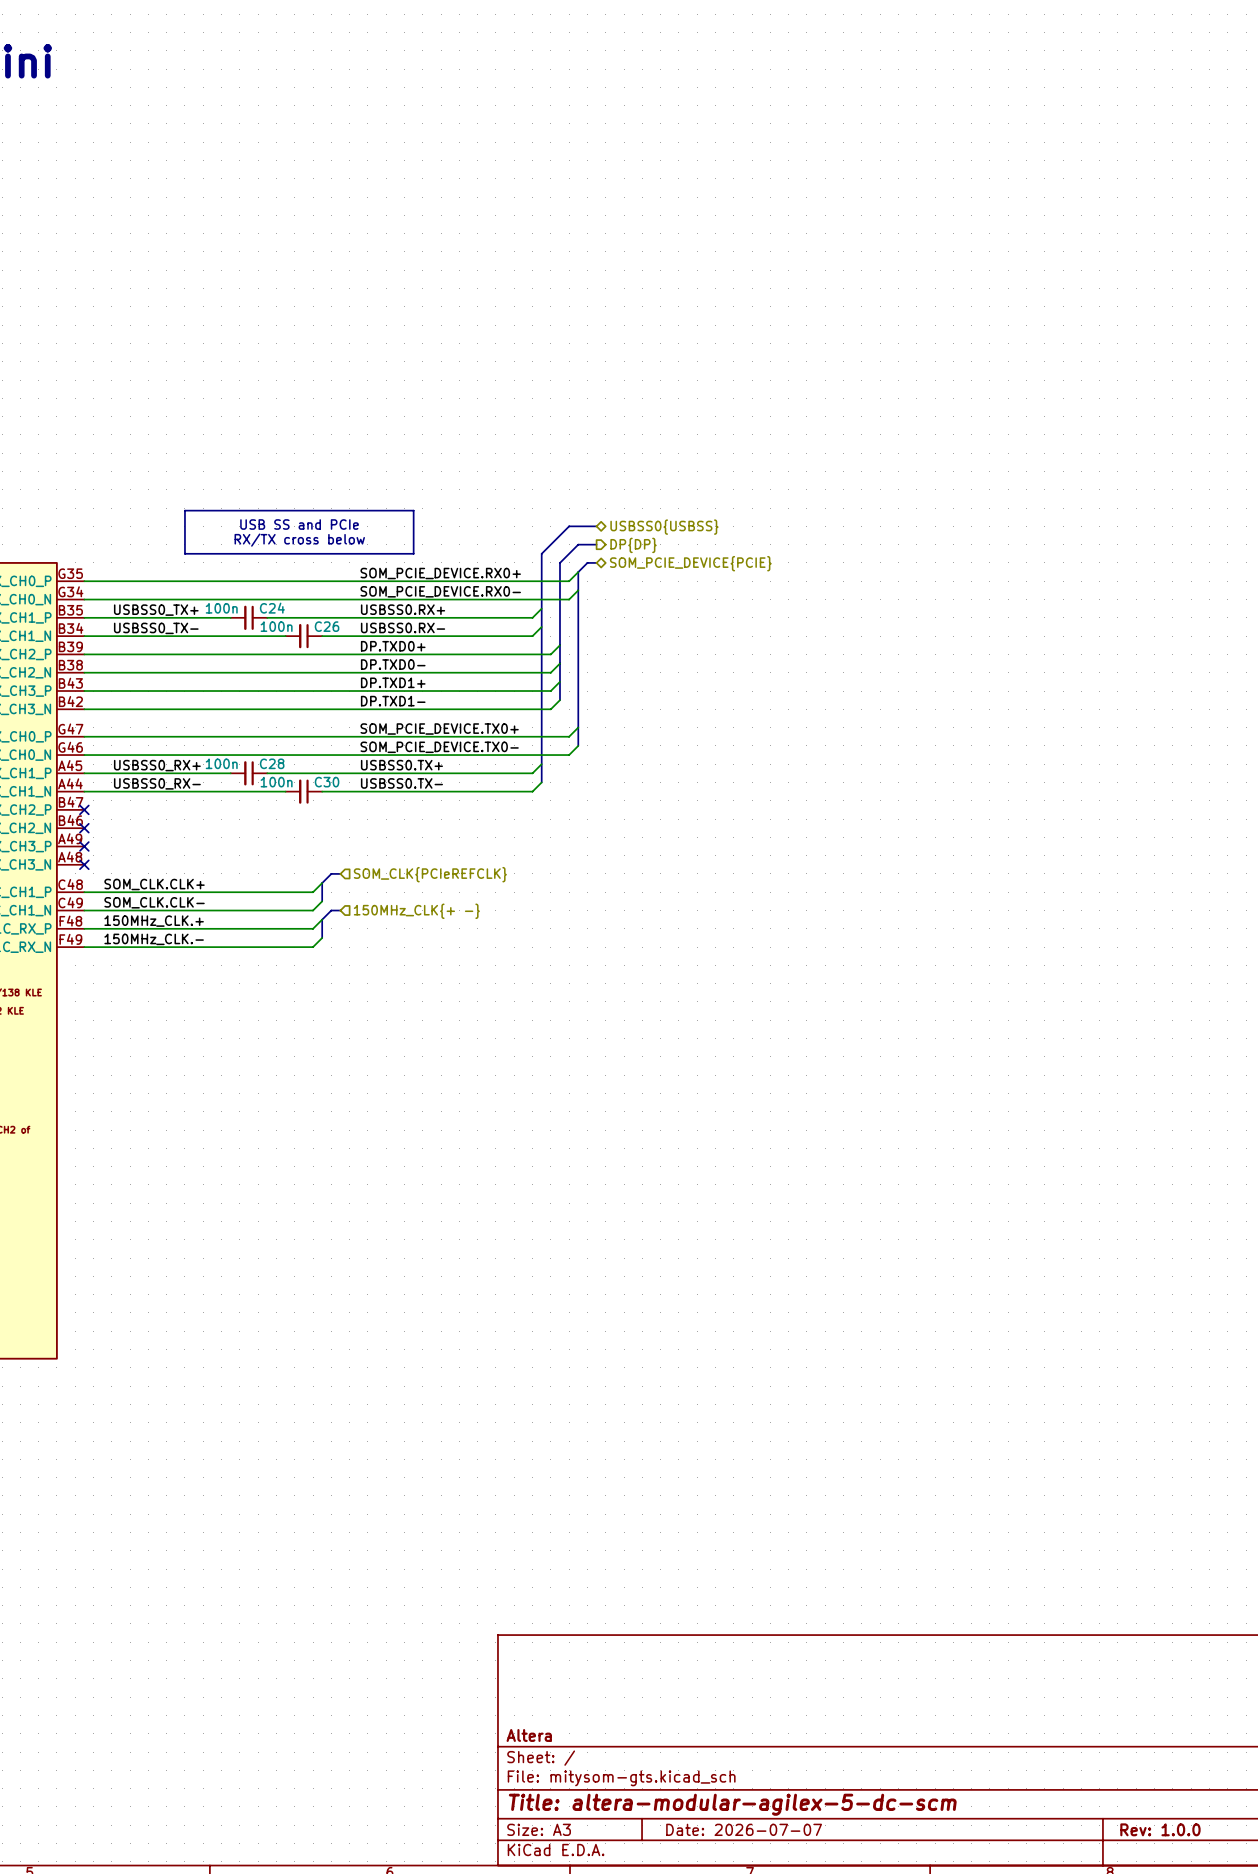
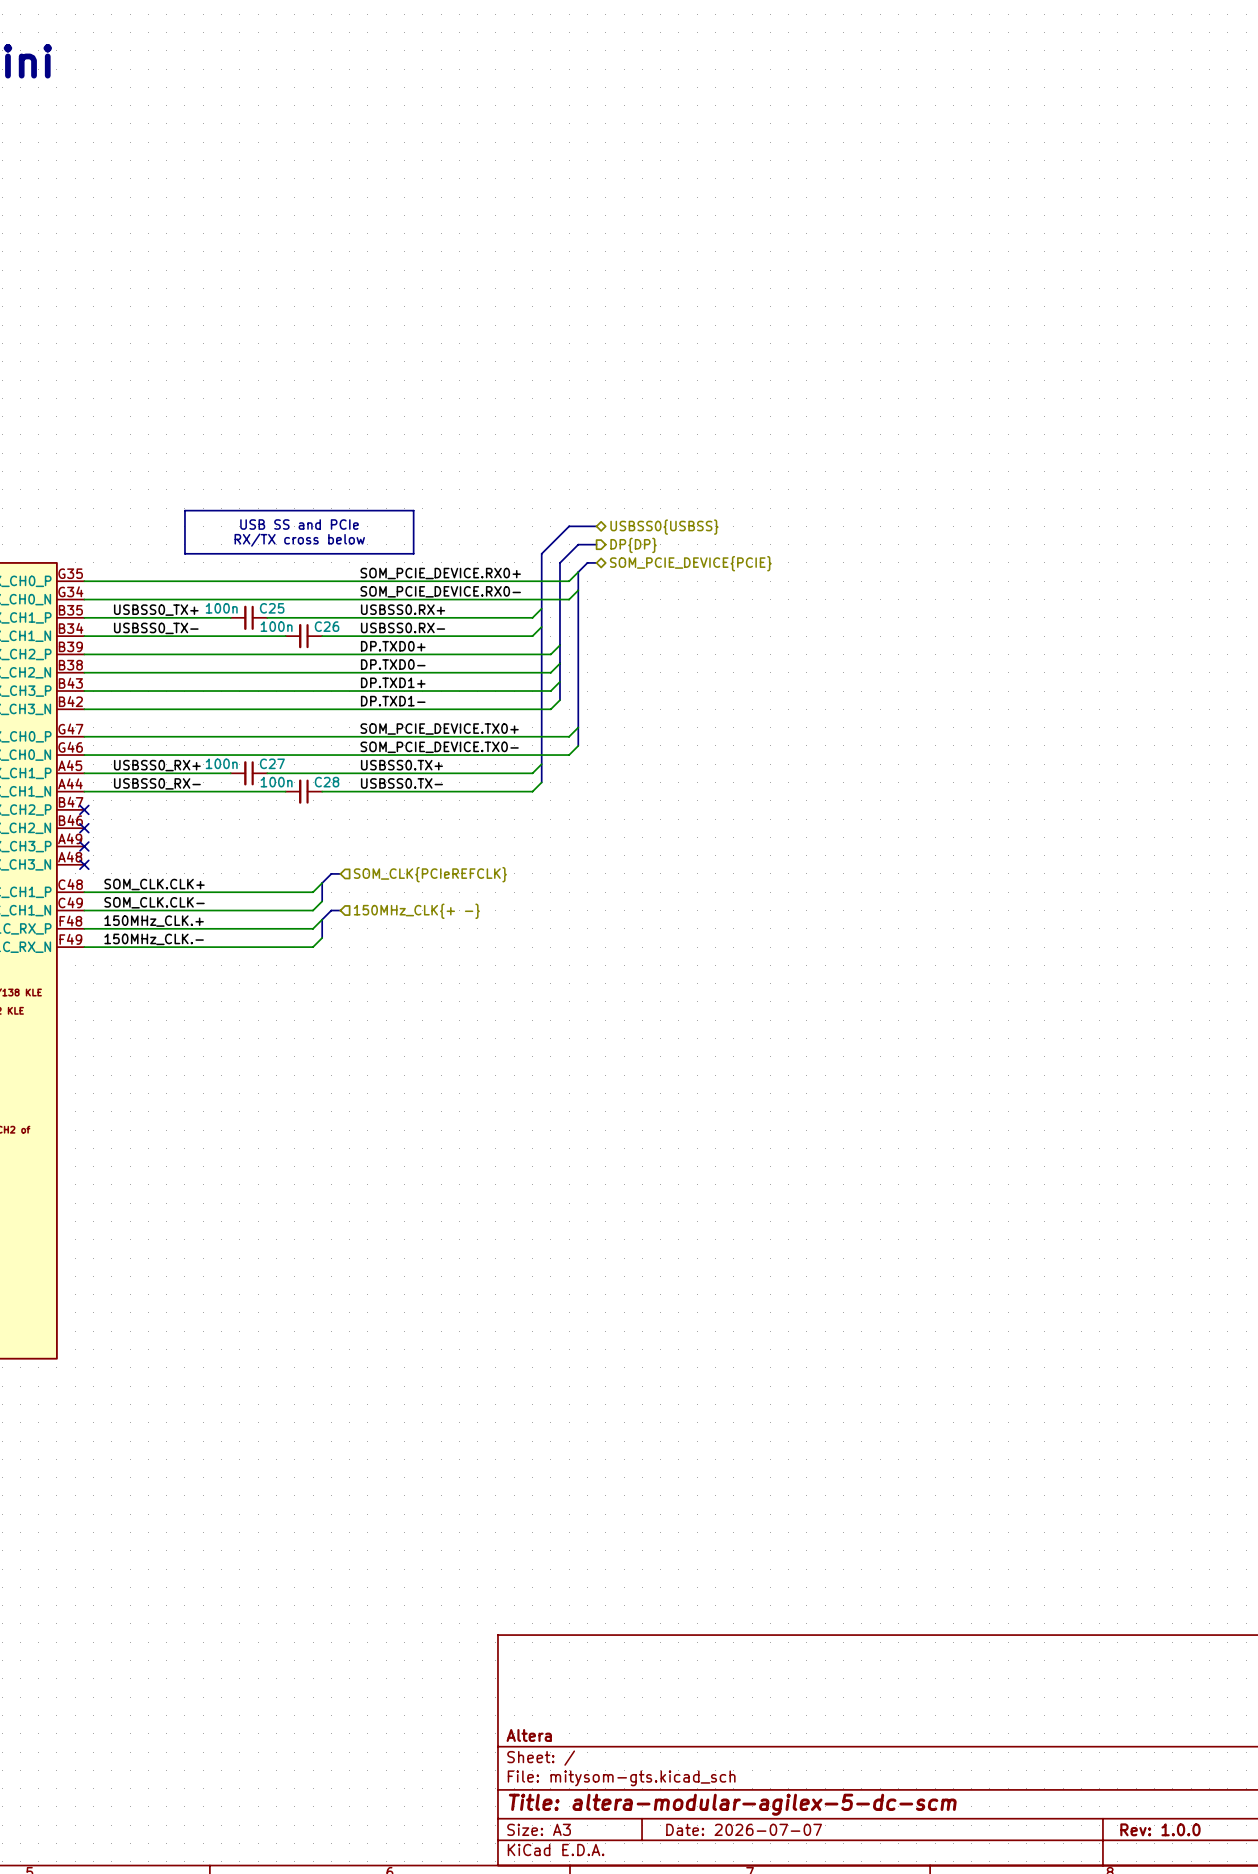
C24 name: C24 (272, 608) -> C25 (272, 608)
C28 name: C28 (272, 763) -> C27 (272, 763)
C30 name: C30 (327, 782) -> C28 (327, 782)

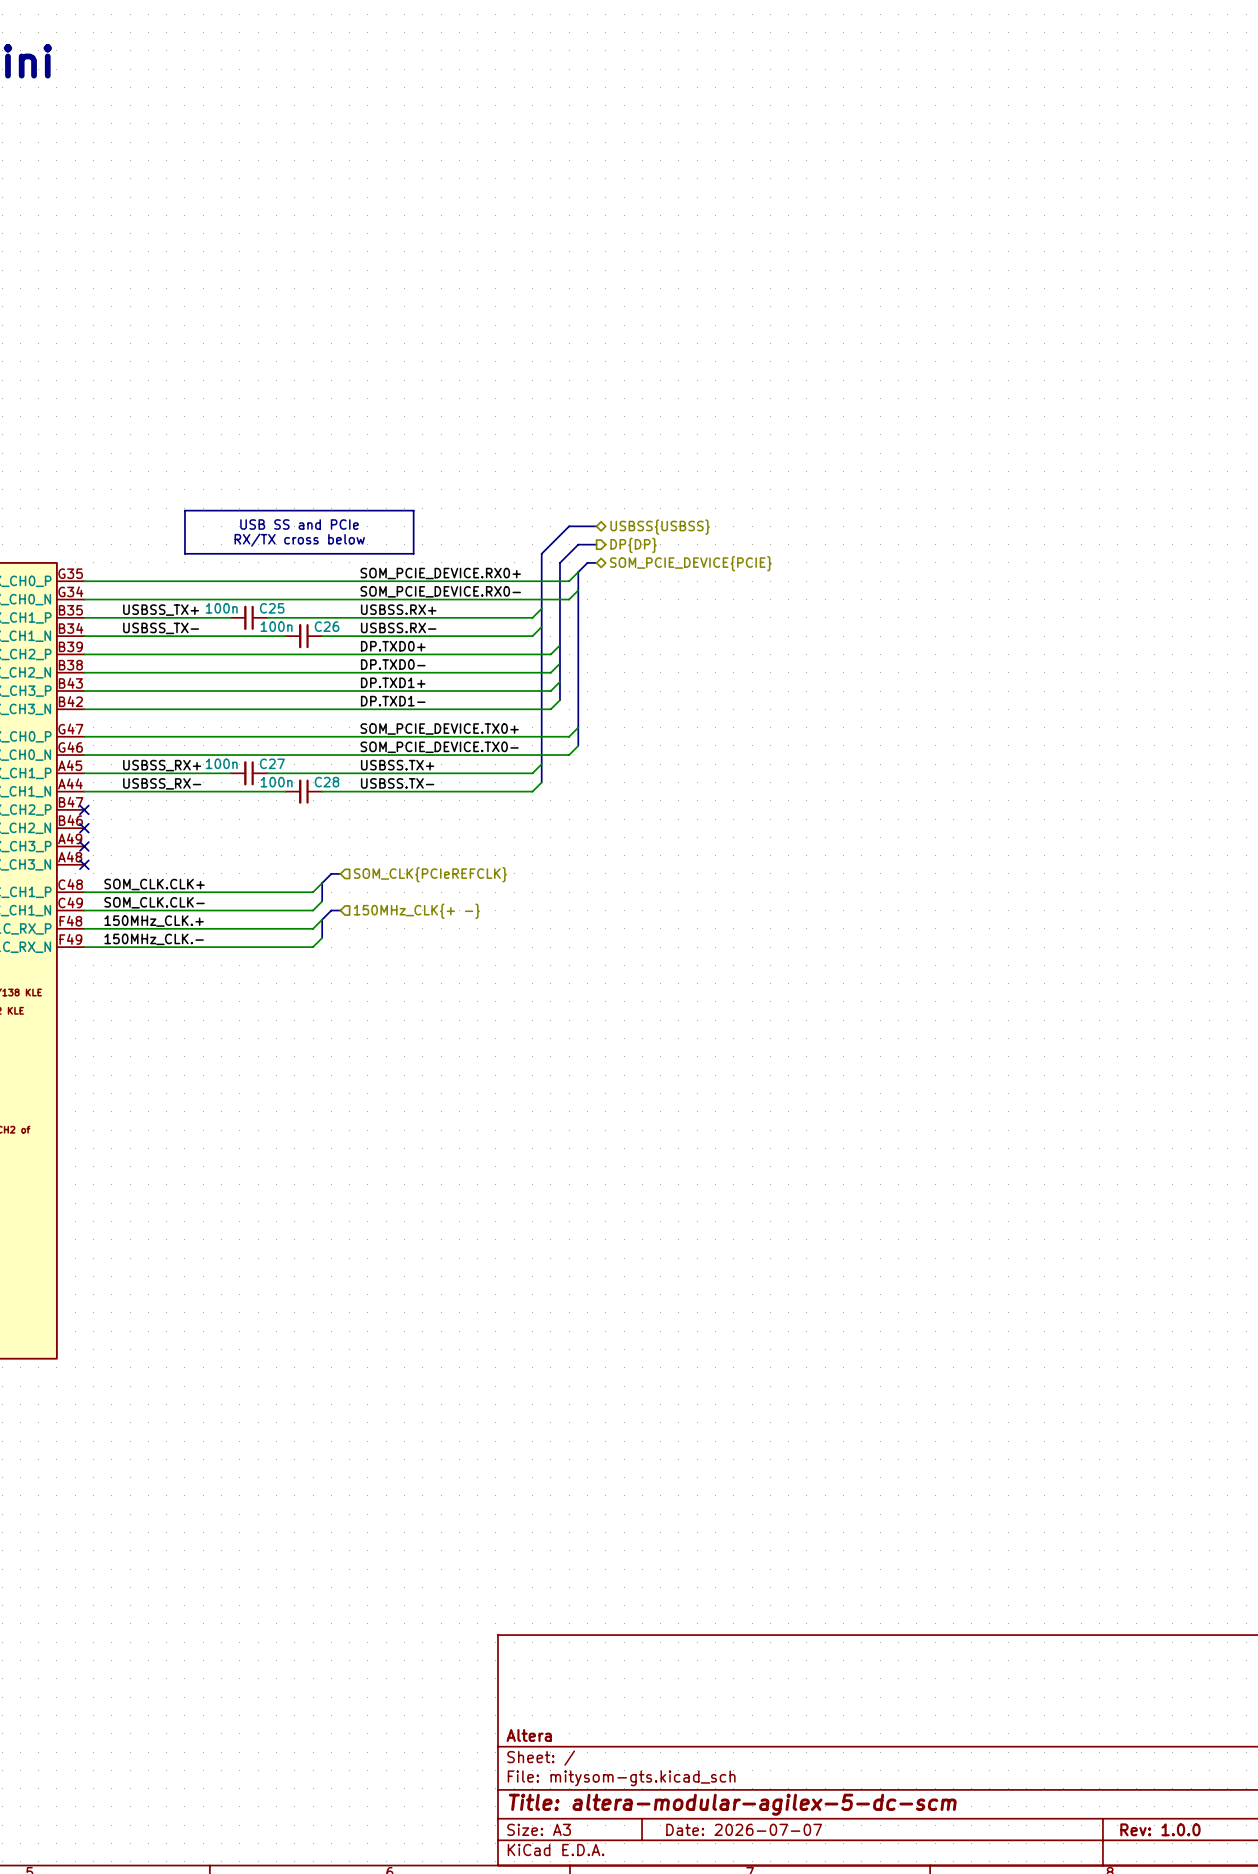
hierarchical label: USBSS0{USBSS} (664, 527) -> USBSS{USBSS} (660, 527)
label: USBSS0.RX+ (403, 609) -> USBSS.RX+ (398, 609)
label: USBSS0_TX+ (156, 610) -> USBSS_TX+ (161, 610)
label: USBSS0.RX- (403, 627) -> USBSS.RX- (398, 627)
label: USBSS0_TX- (156, 628) -> USBSS_TX- (161, 628)
label: USBSS0_RX+ (157, 765) -> USBSS_RX+ (162, 765)
label: USBSS0.TX+ (401, 765) -> USBSS.TX+ (397, 765)
label: USBSS0_RX- (157, 783) -> USBSS_RX- (162, 783)
label: USBSS0.TX- (401, 783) -> USBSS.TX- (397, 783)

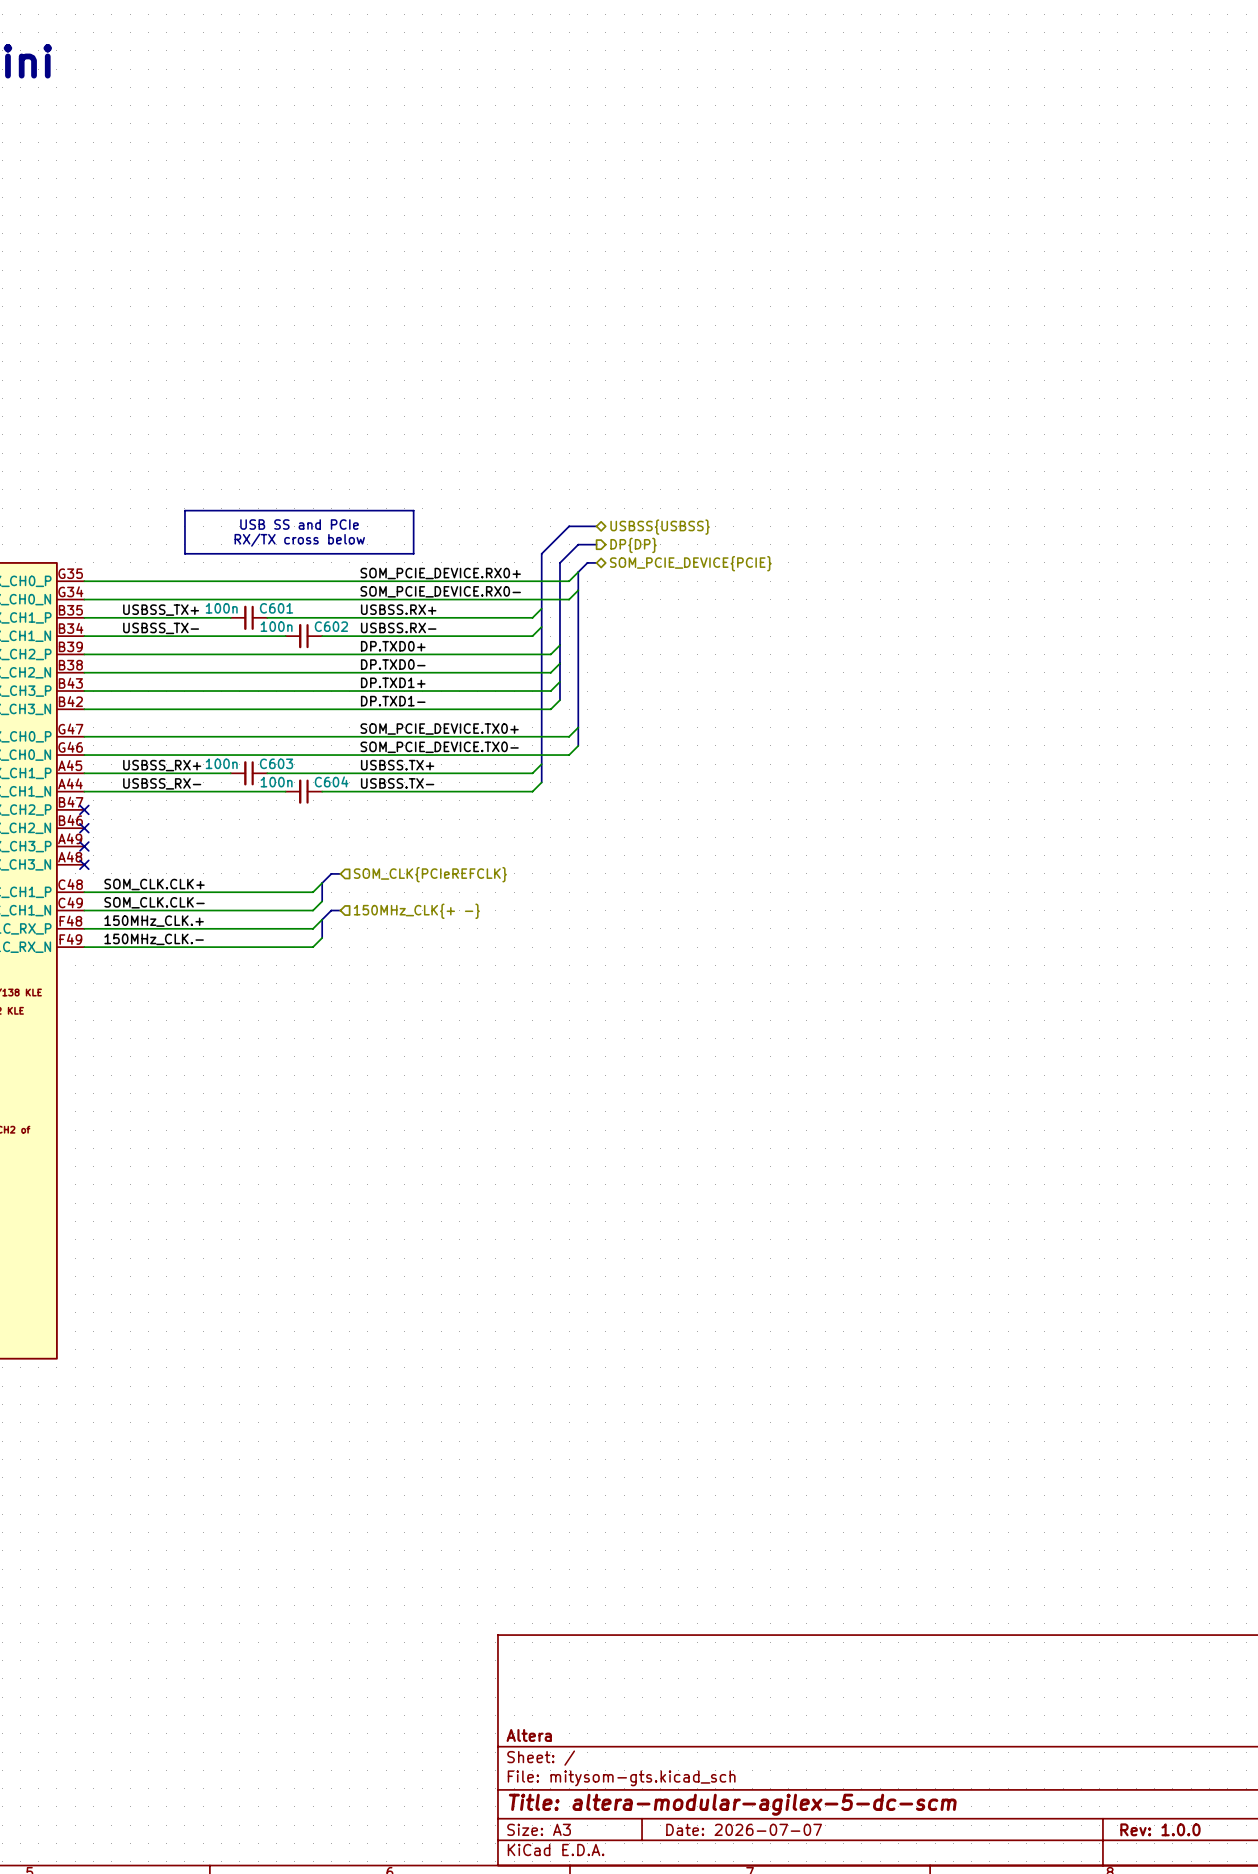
C25 name: C25 (272, 608) -> C601 (276, 608)
C26 name: C26 (327, 626) -> C602 (331, 626)
C27 name: C27 (272, 763) -> C603 (276, 763)
C28 name: C28 (327, 782) -> C604 (331, 781)

